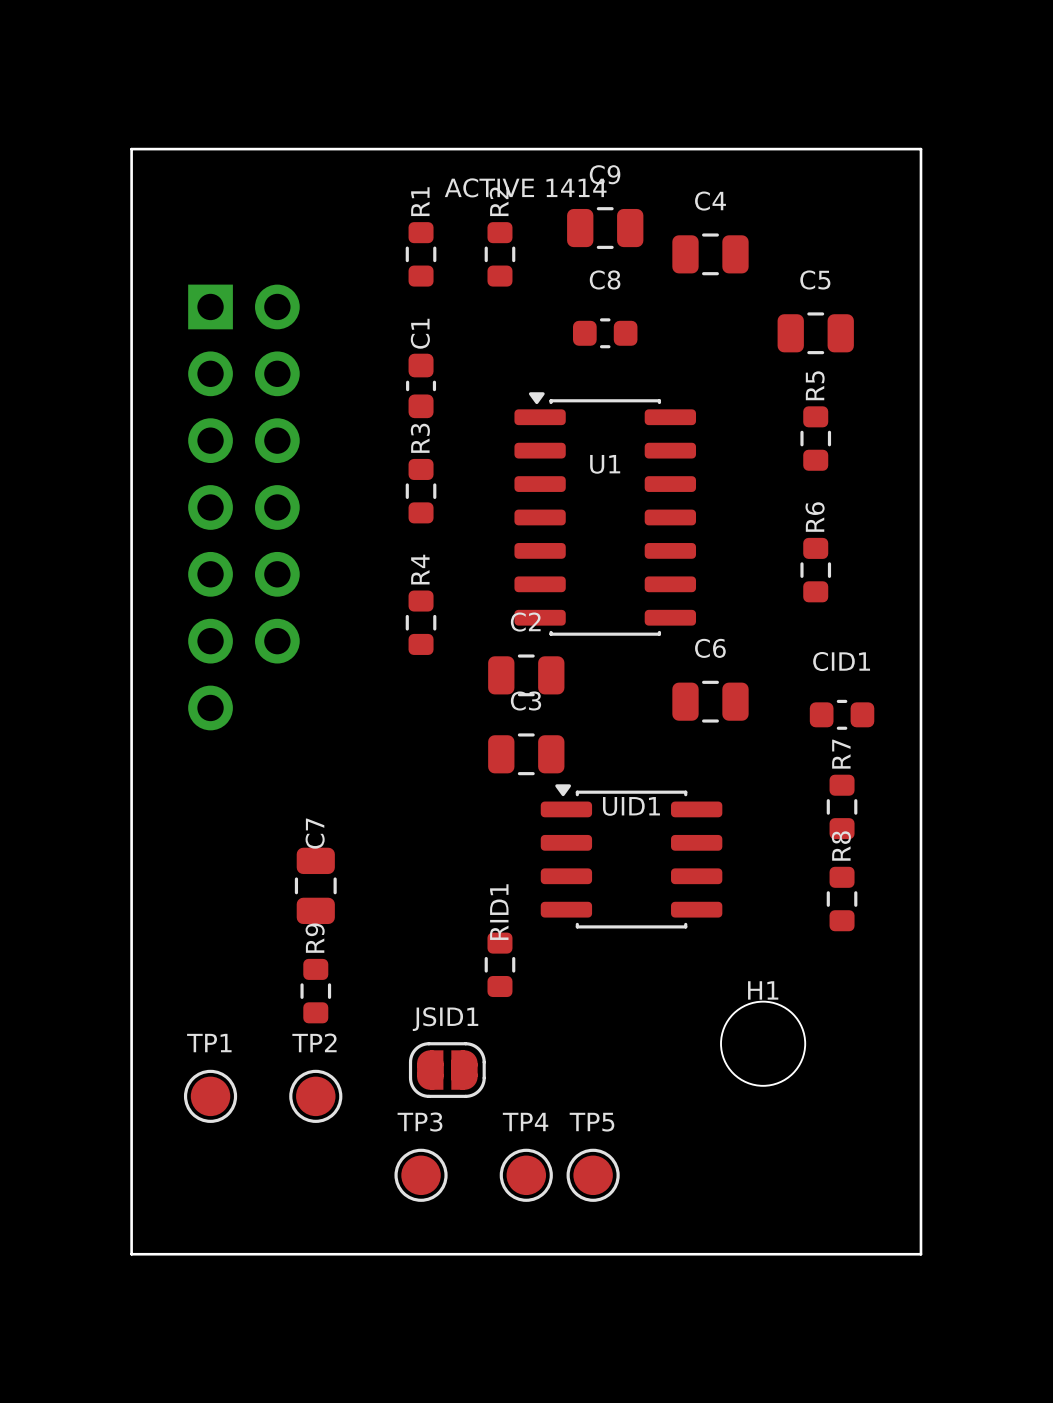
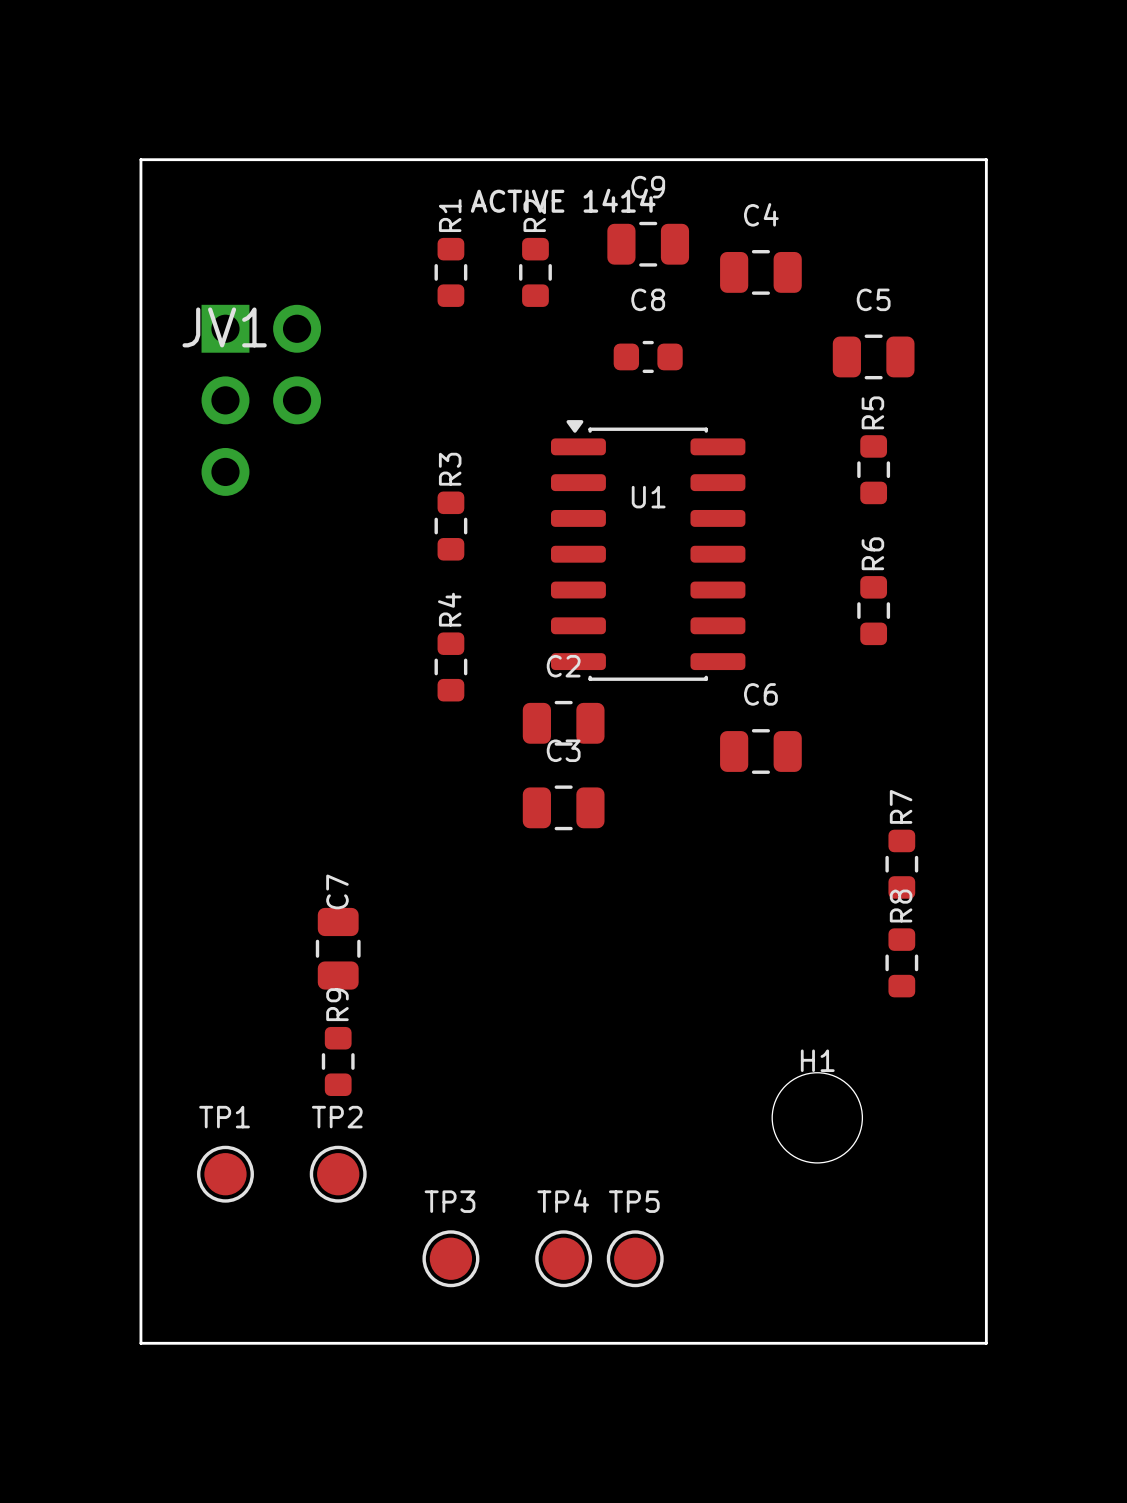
JV1: none -> (261, 400)
C1: (421, 385) -> none
part: (243, 507) -> none
CID1: (842, 714) -> none
UID1: (631, 856) -> none
RID1: (499, 964) -> none
JSID1: (447, 1070) -> none

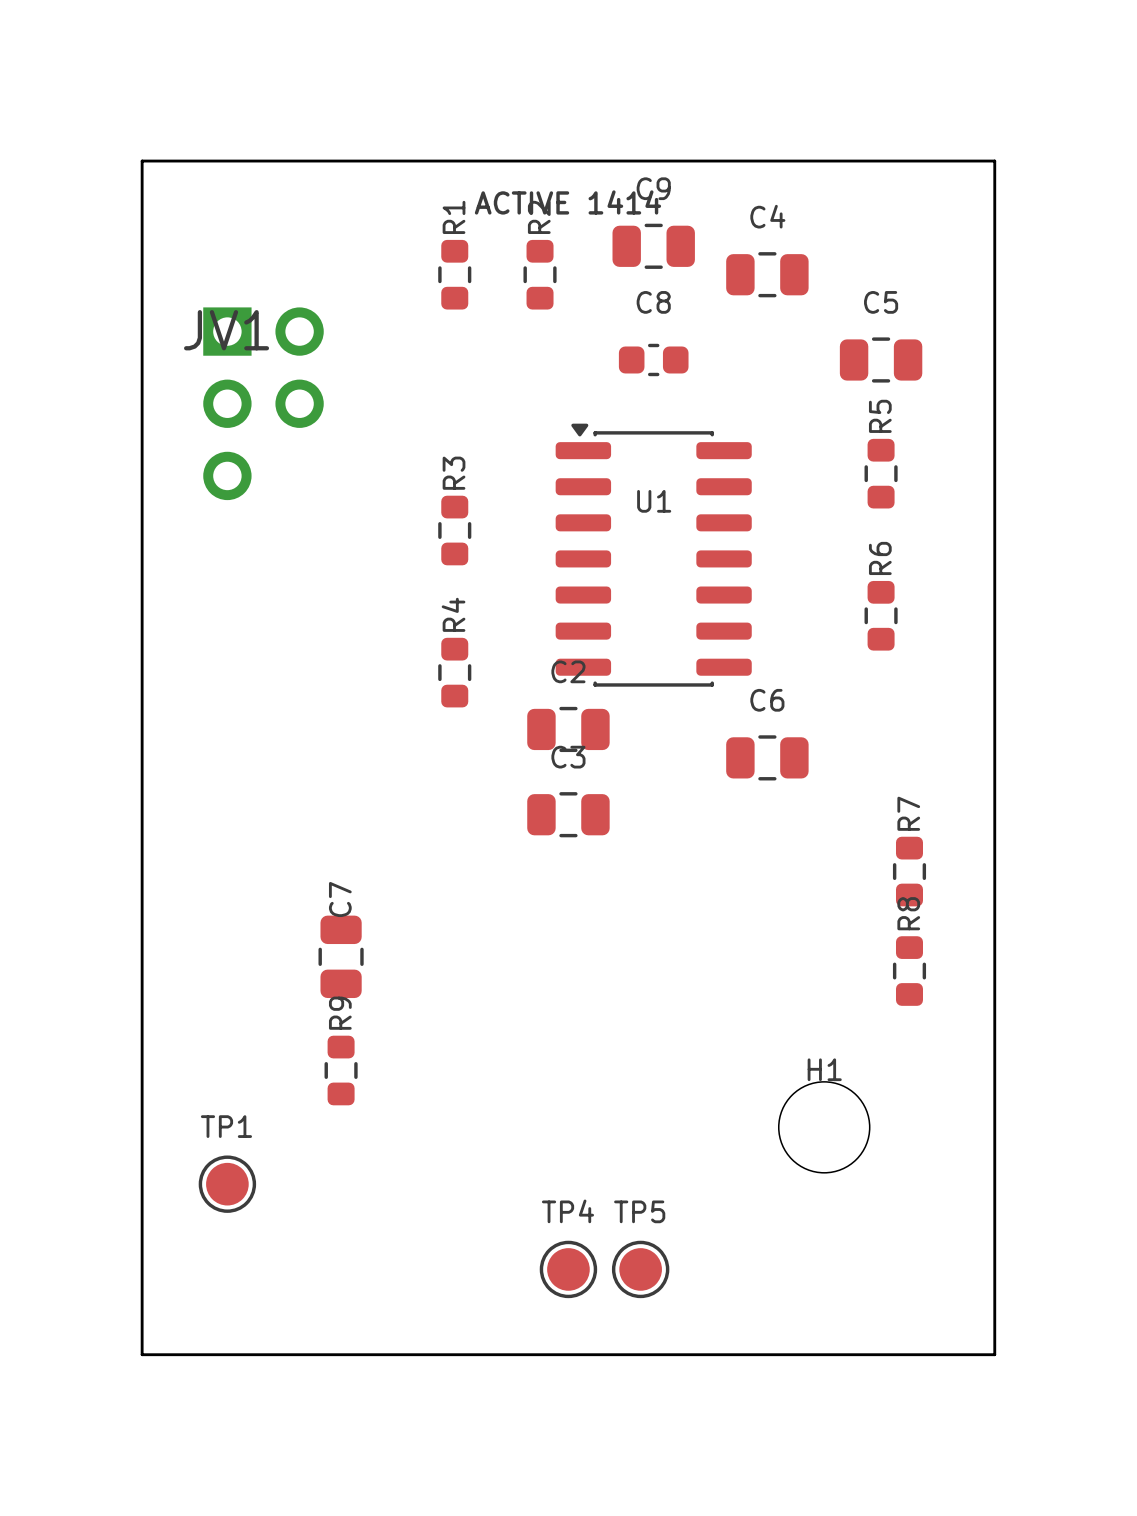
TP2: (338, 1174) -> none
TP3: (450, 1258) -> none

